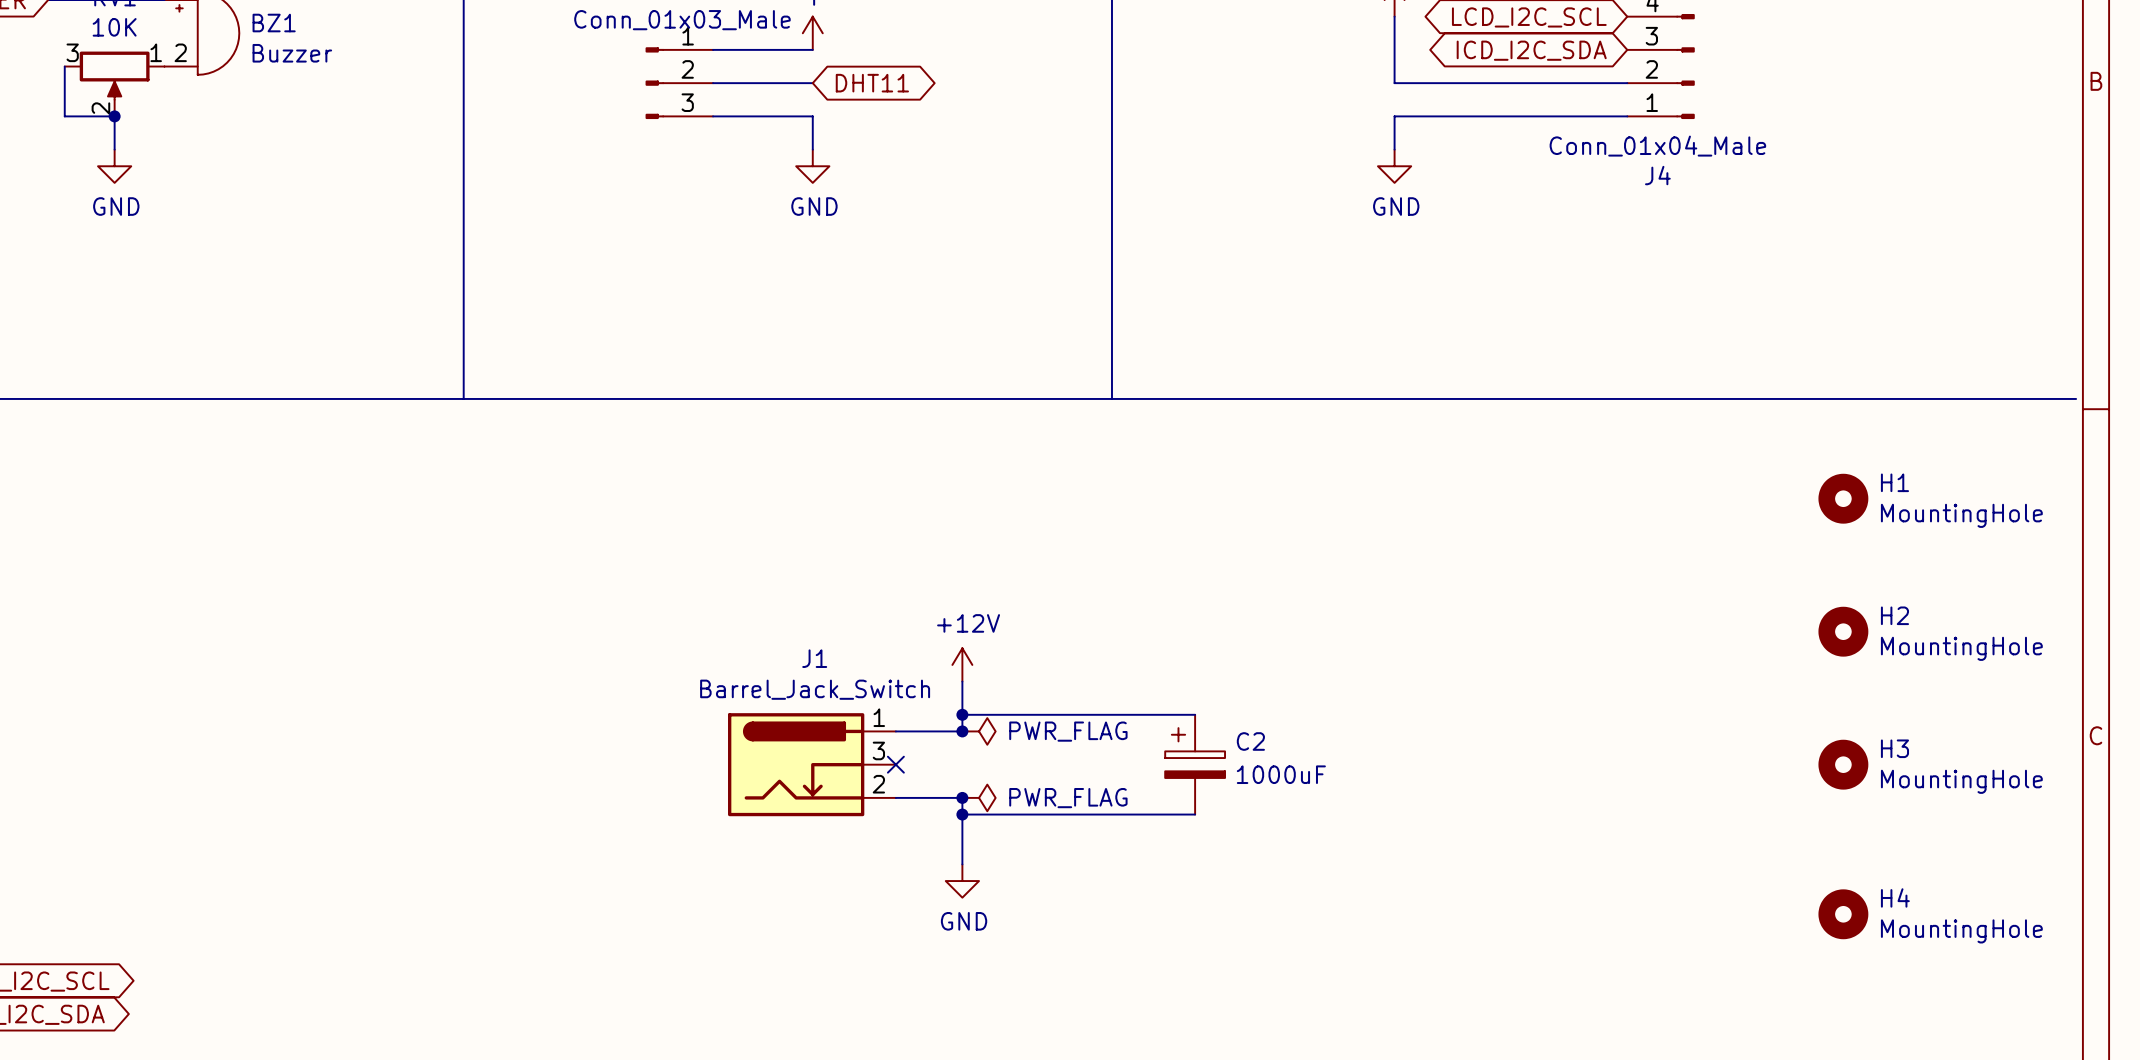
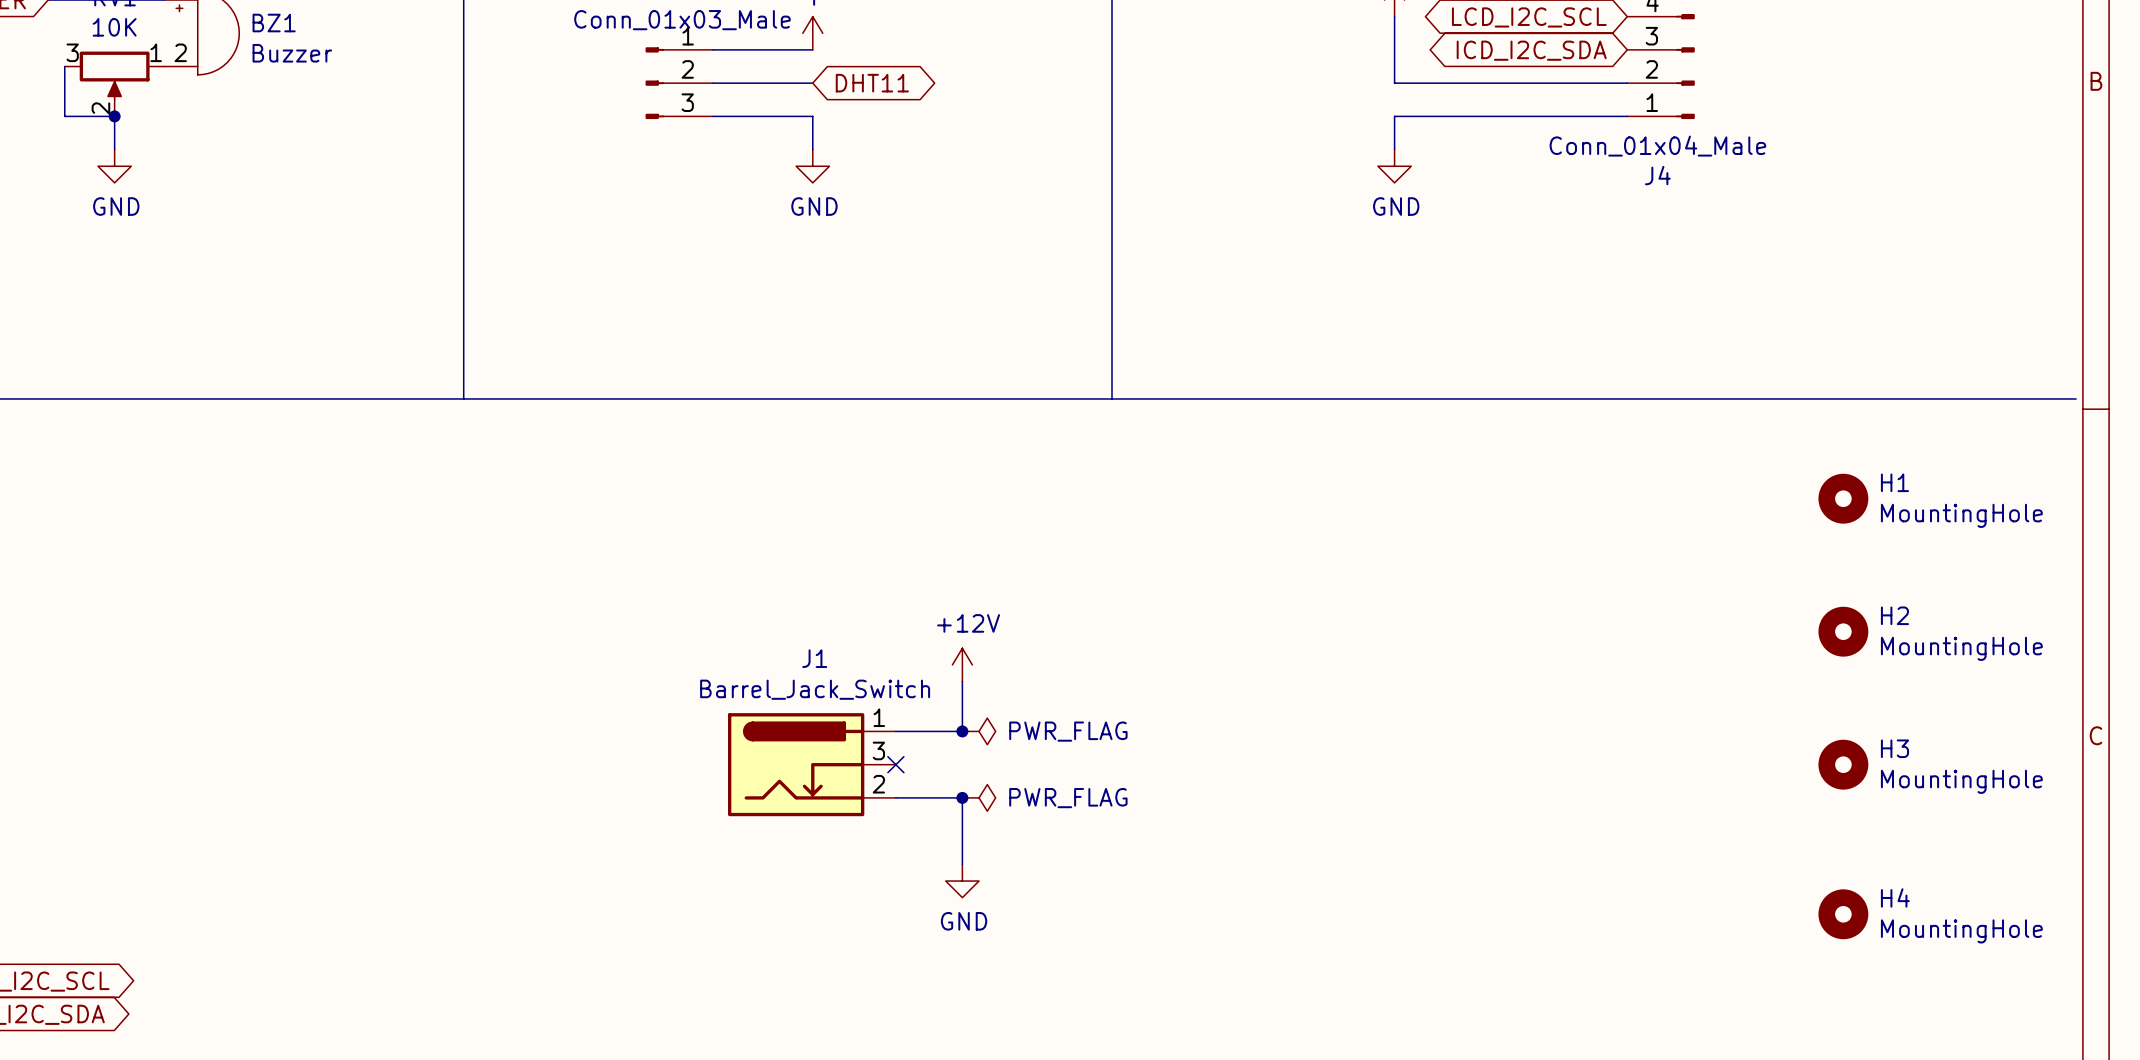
wire: (962, 714) (1195, 714) -> none
junction: (962, 714) -> none
C2: 1000uF (1195, 764) -> none
wire: (962, 814) (1195, 814) -> none
junction: (962, 814) -> none

